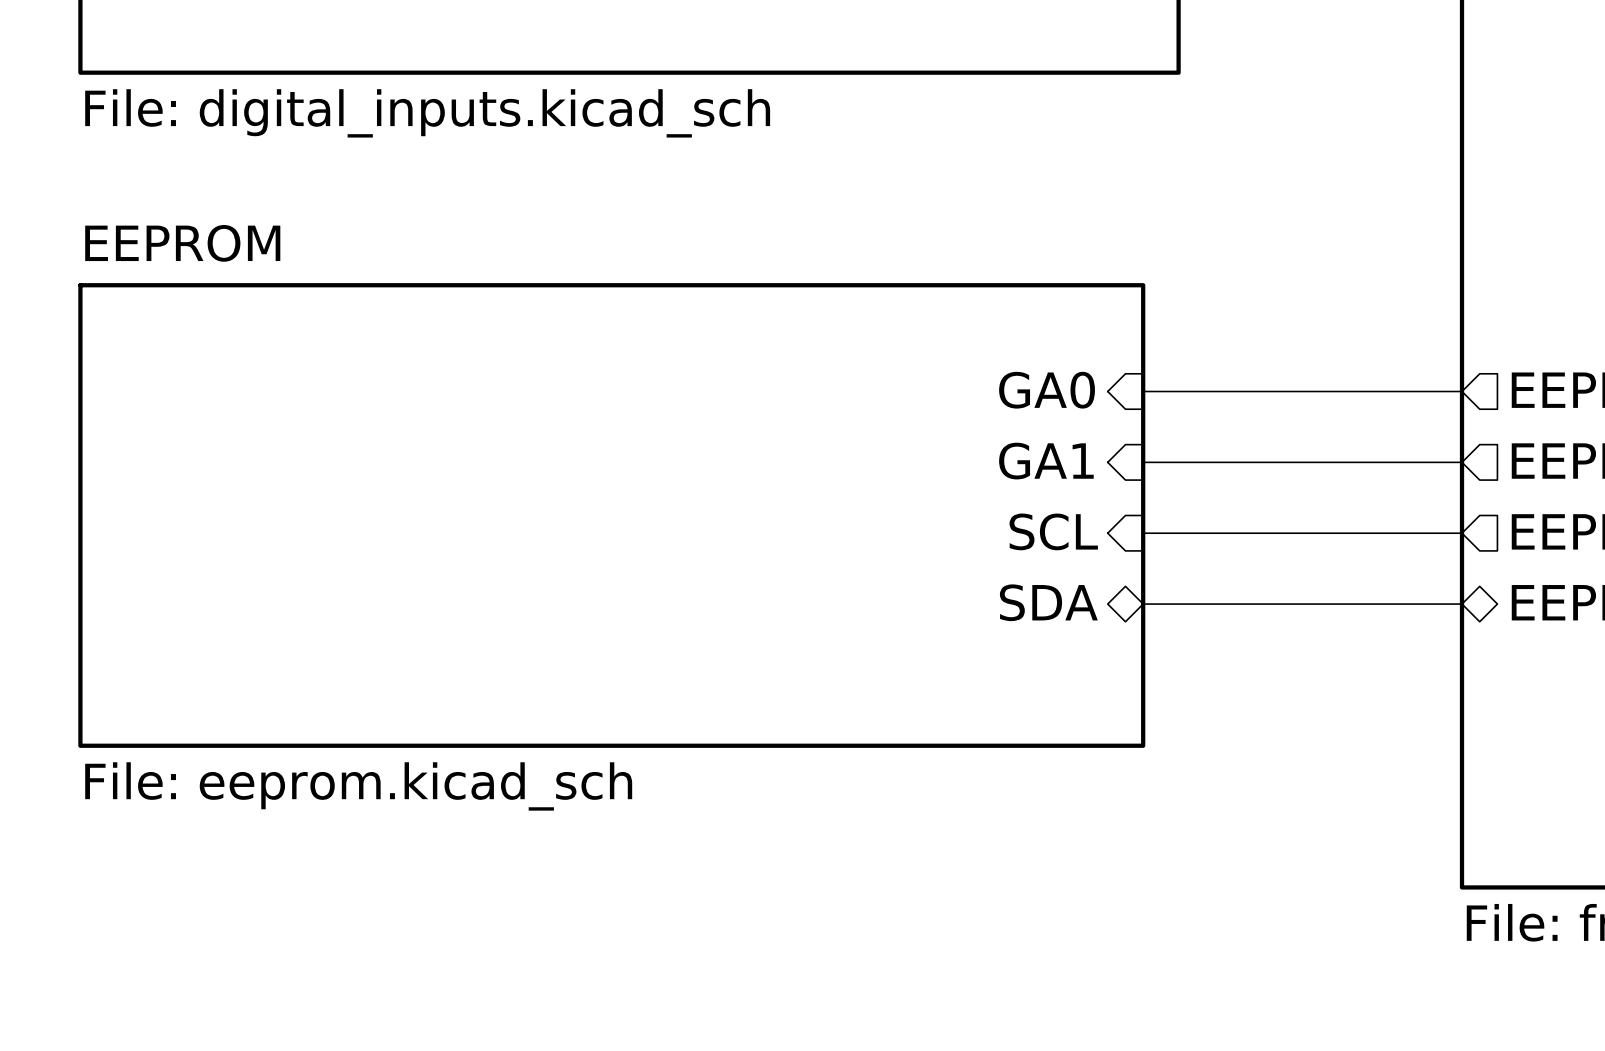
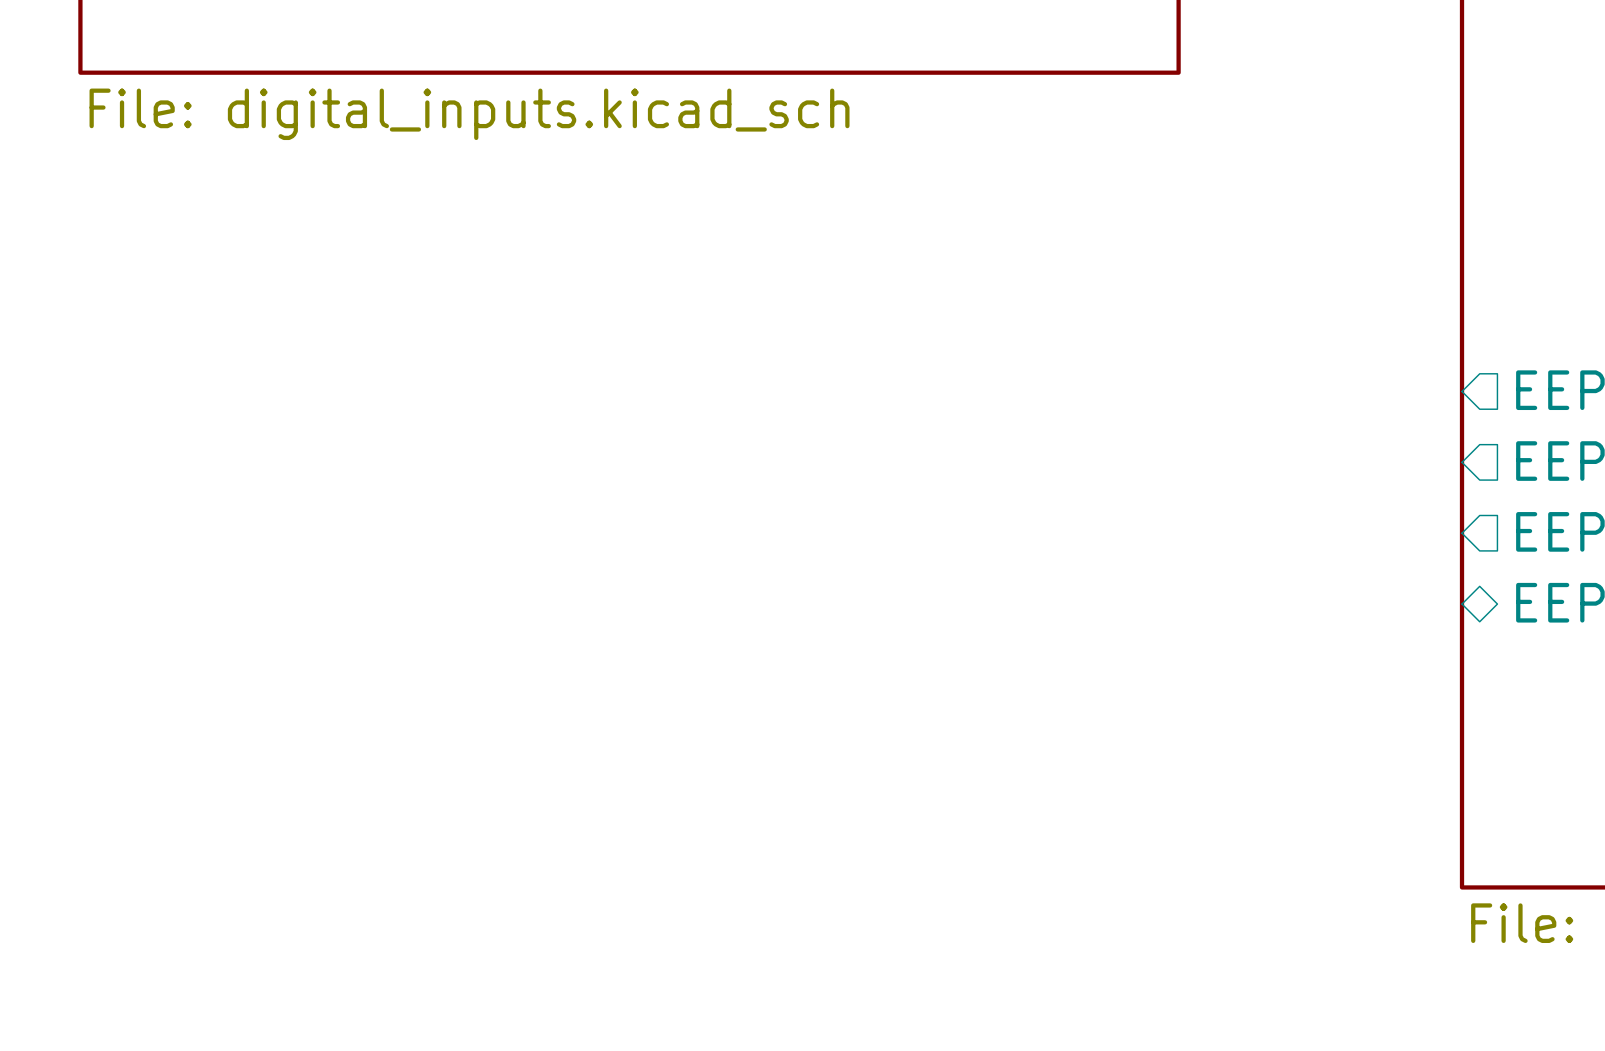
sheet pin: GA0 (1047, 390) -> none
wire: (1143, 391) (1462, 391) -> none
sheet pin: GA1 (1046, 461) -> none
wire: (1143, 462) (1462, 462) -> none
sheet EEPROM: File: eeprom.kicad_sch (611, 515) -> none
sheet pin: SCL (1053, 531) -> none
wire: (1143, 533) (1462, 533) -> none
sheet pin: SDA (1048, 602) -> none
wire: (1143, 604) (1462, 604) -> none

